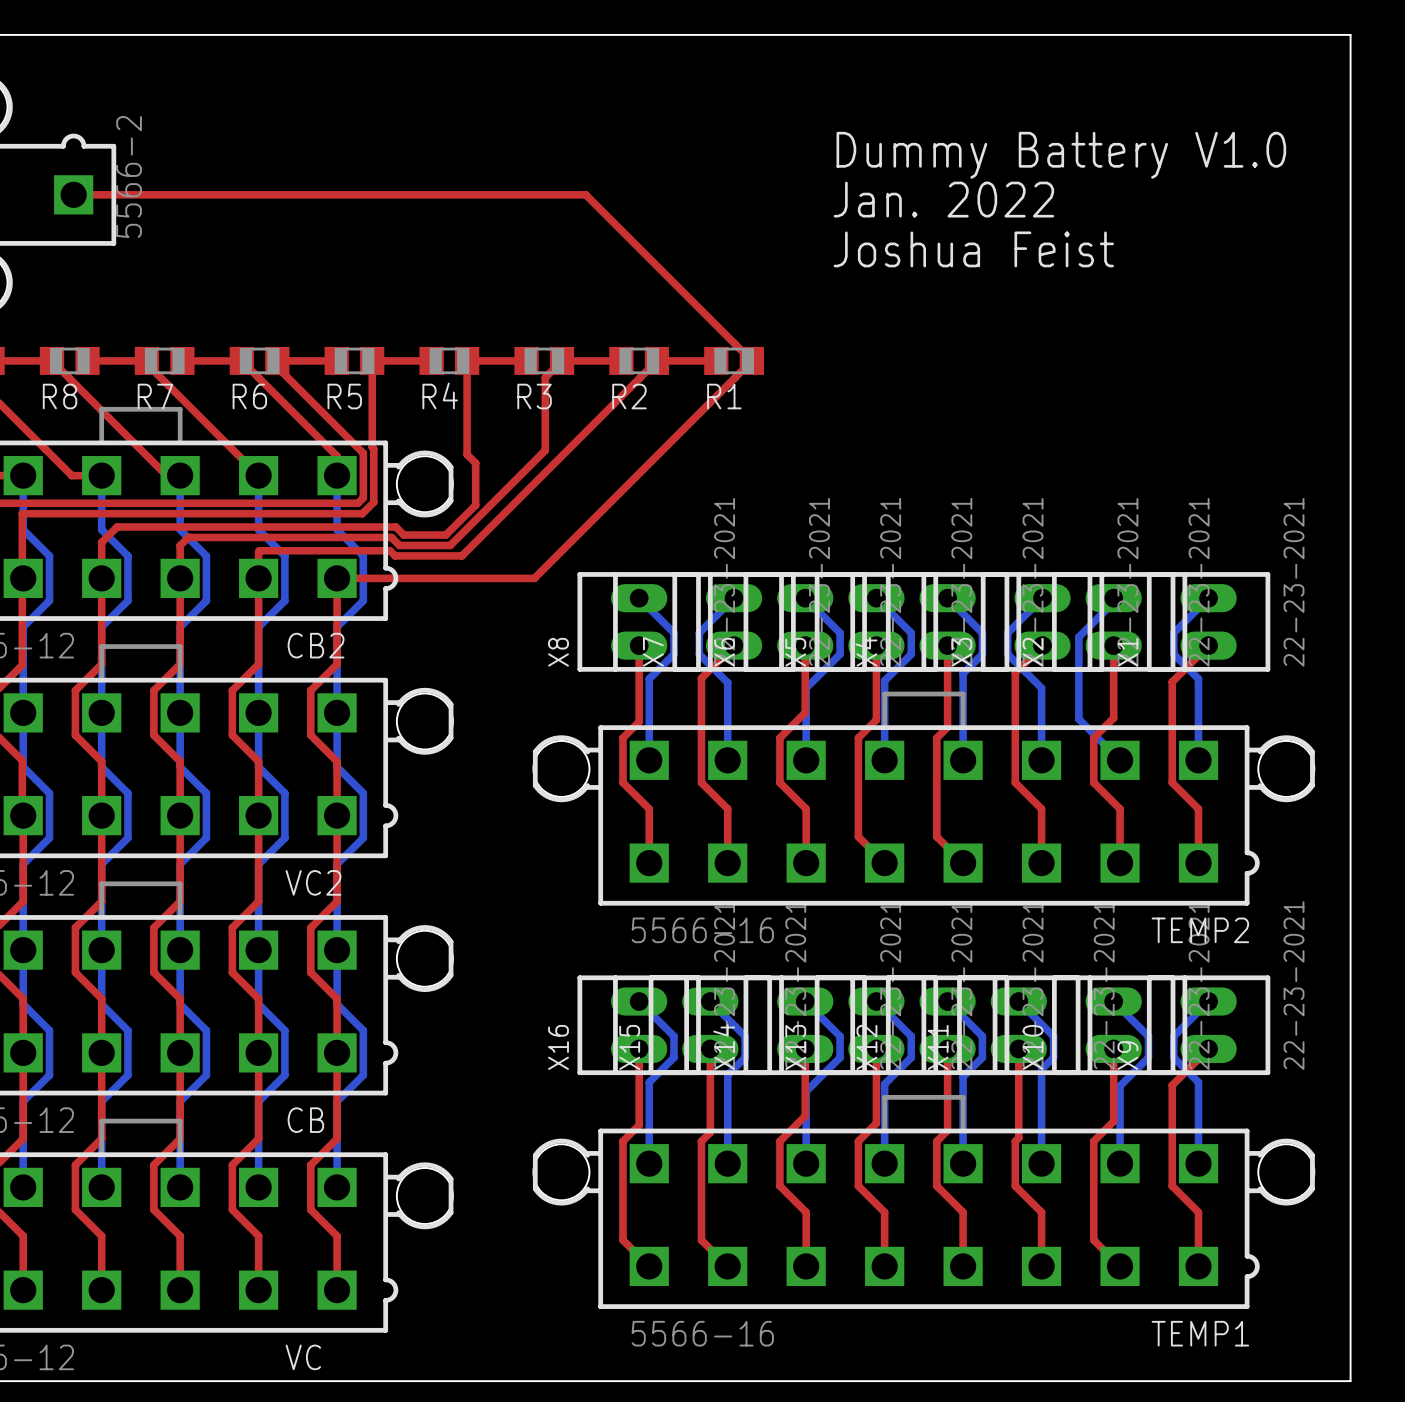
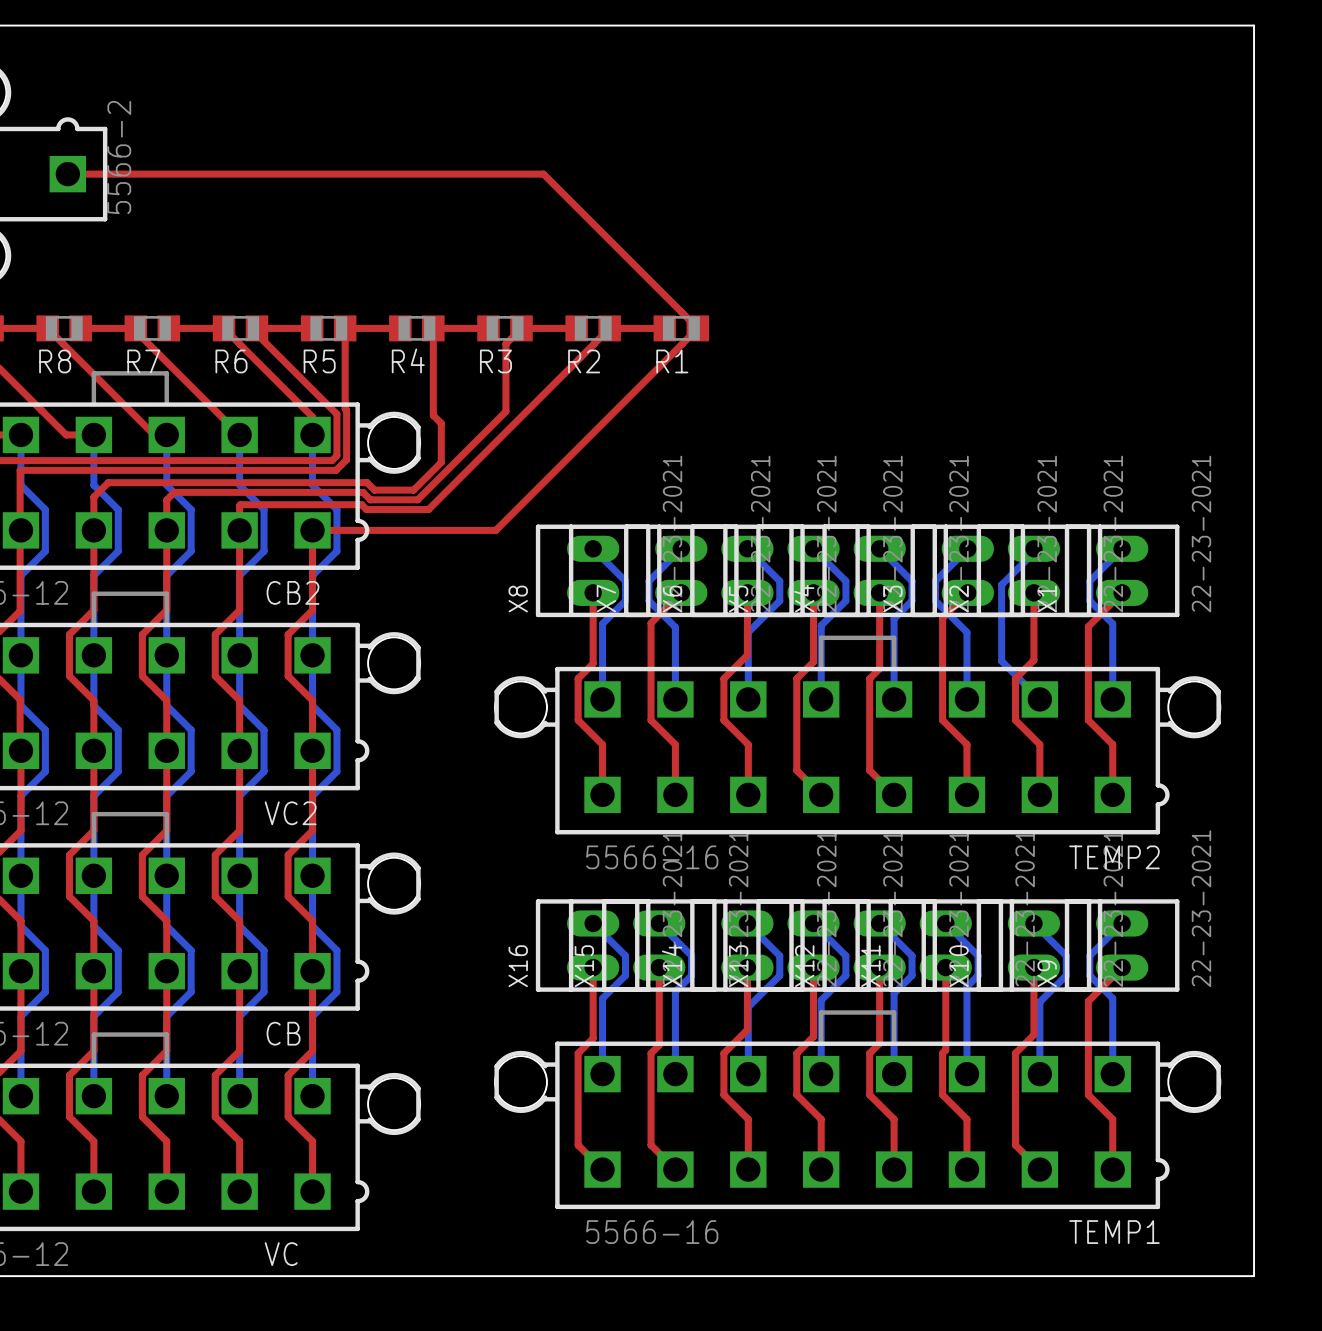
text: Dummy Battery V1.0 (1061, 155) -> none
text: Jan. 2022 (943, 199) -> none
text: Joshua Feist (973, 249) -> none

